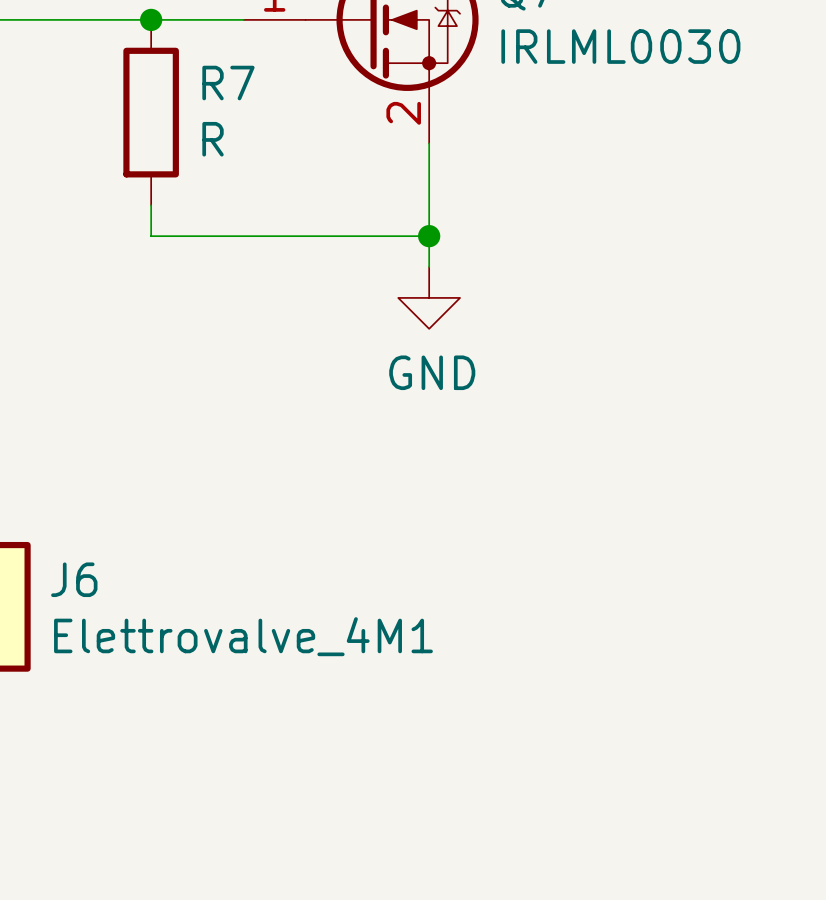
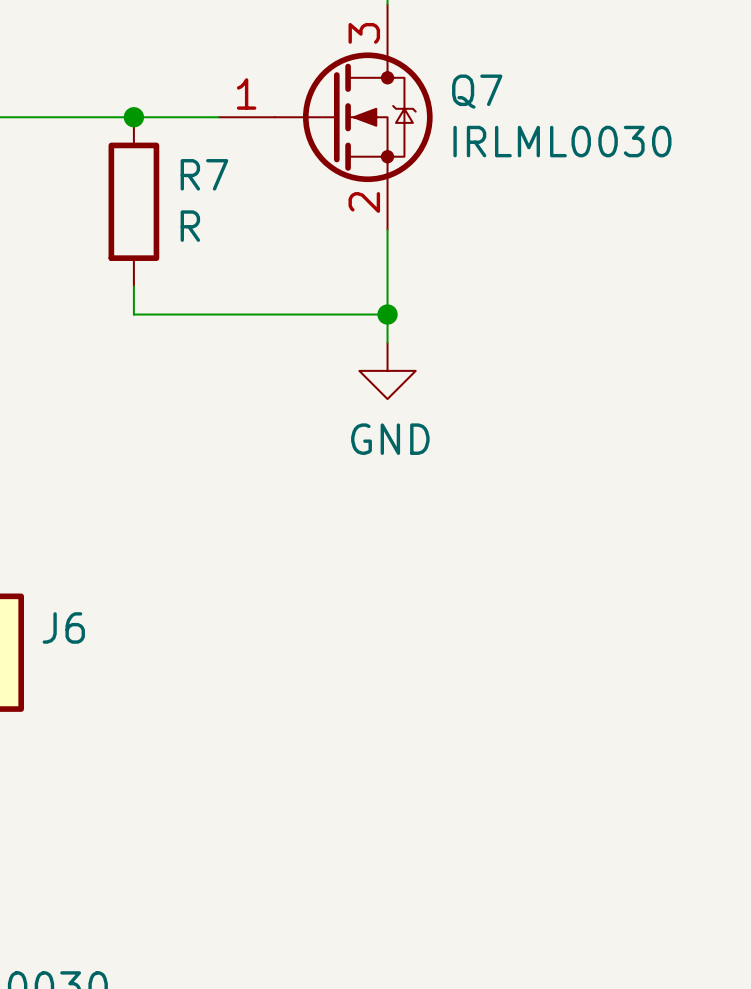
J6 value: Elettrovalve_4M1 (243, 636) -> none

